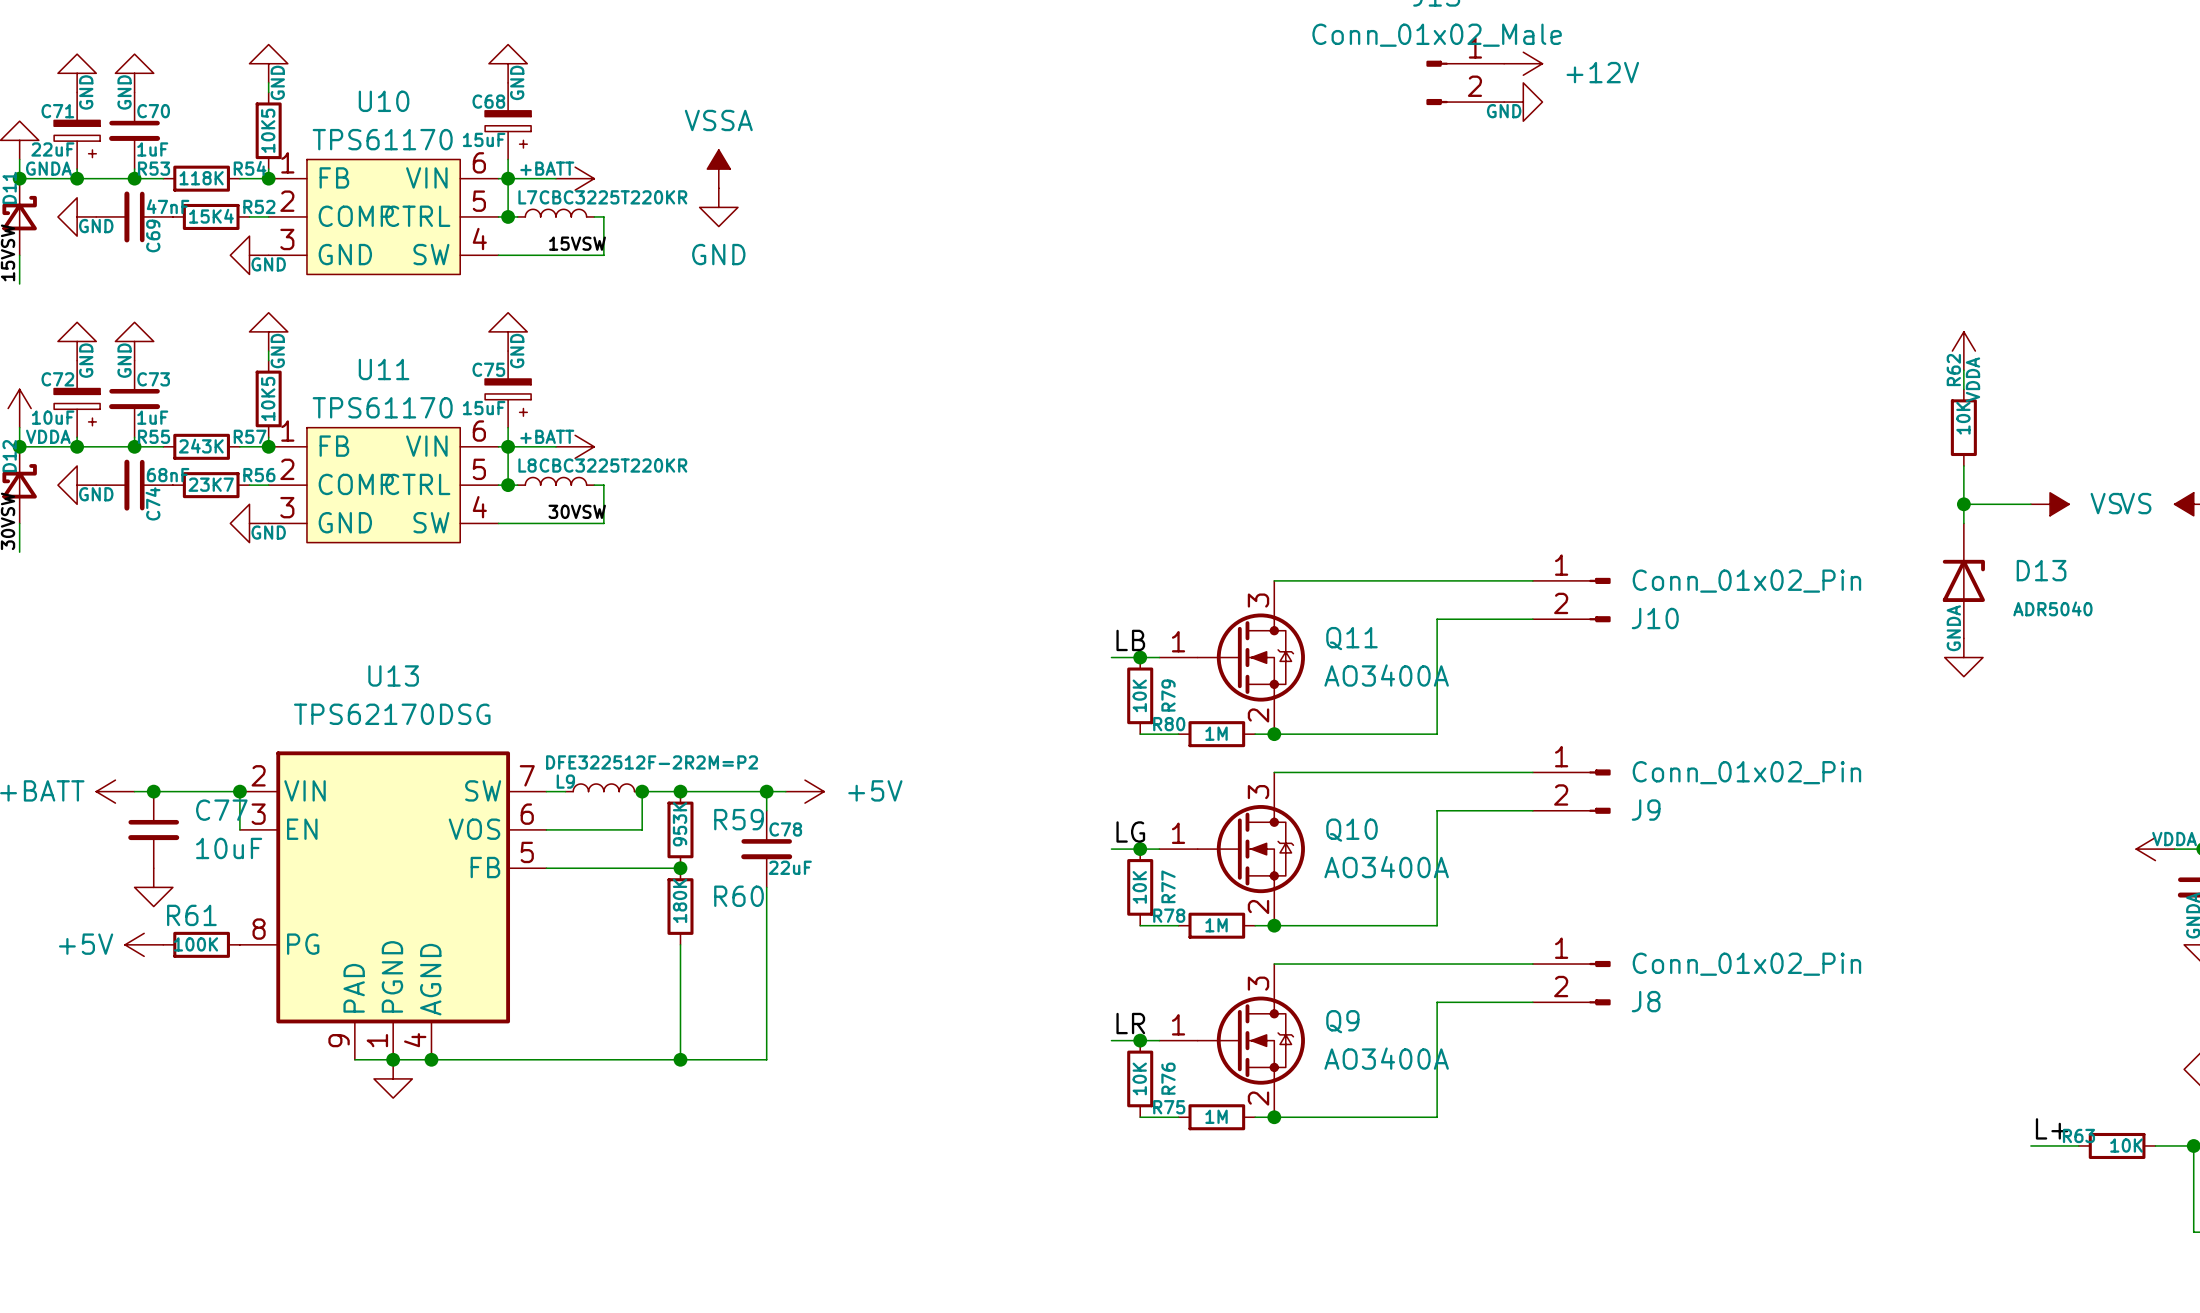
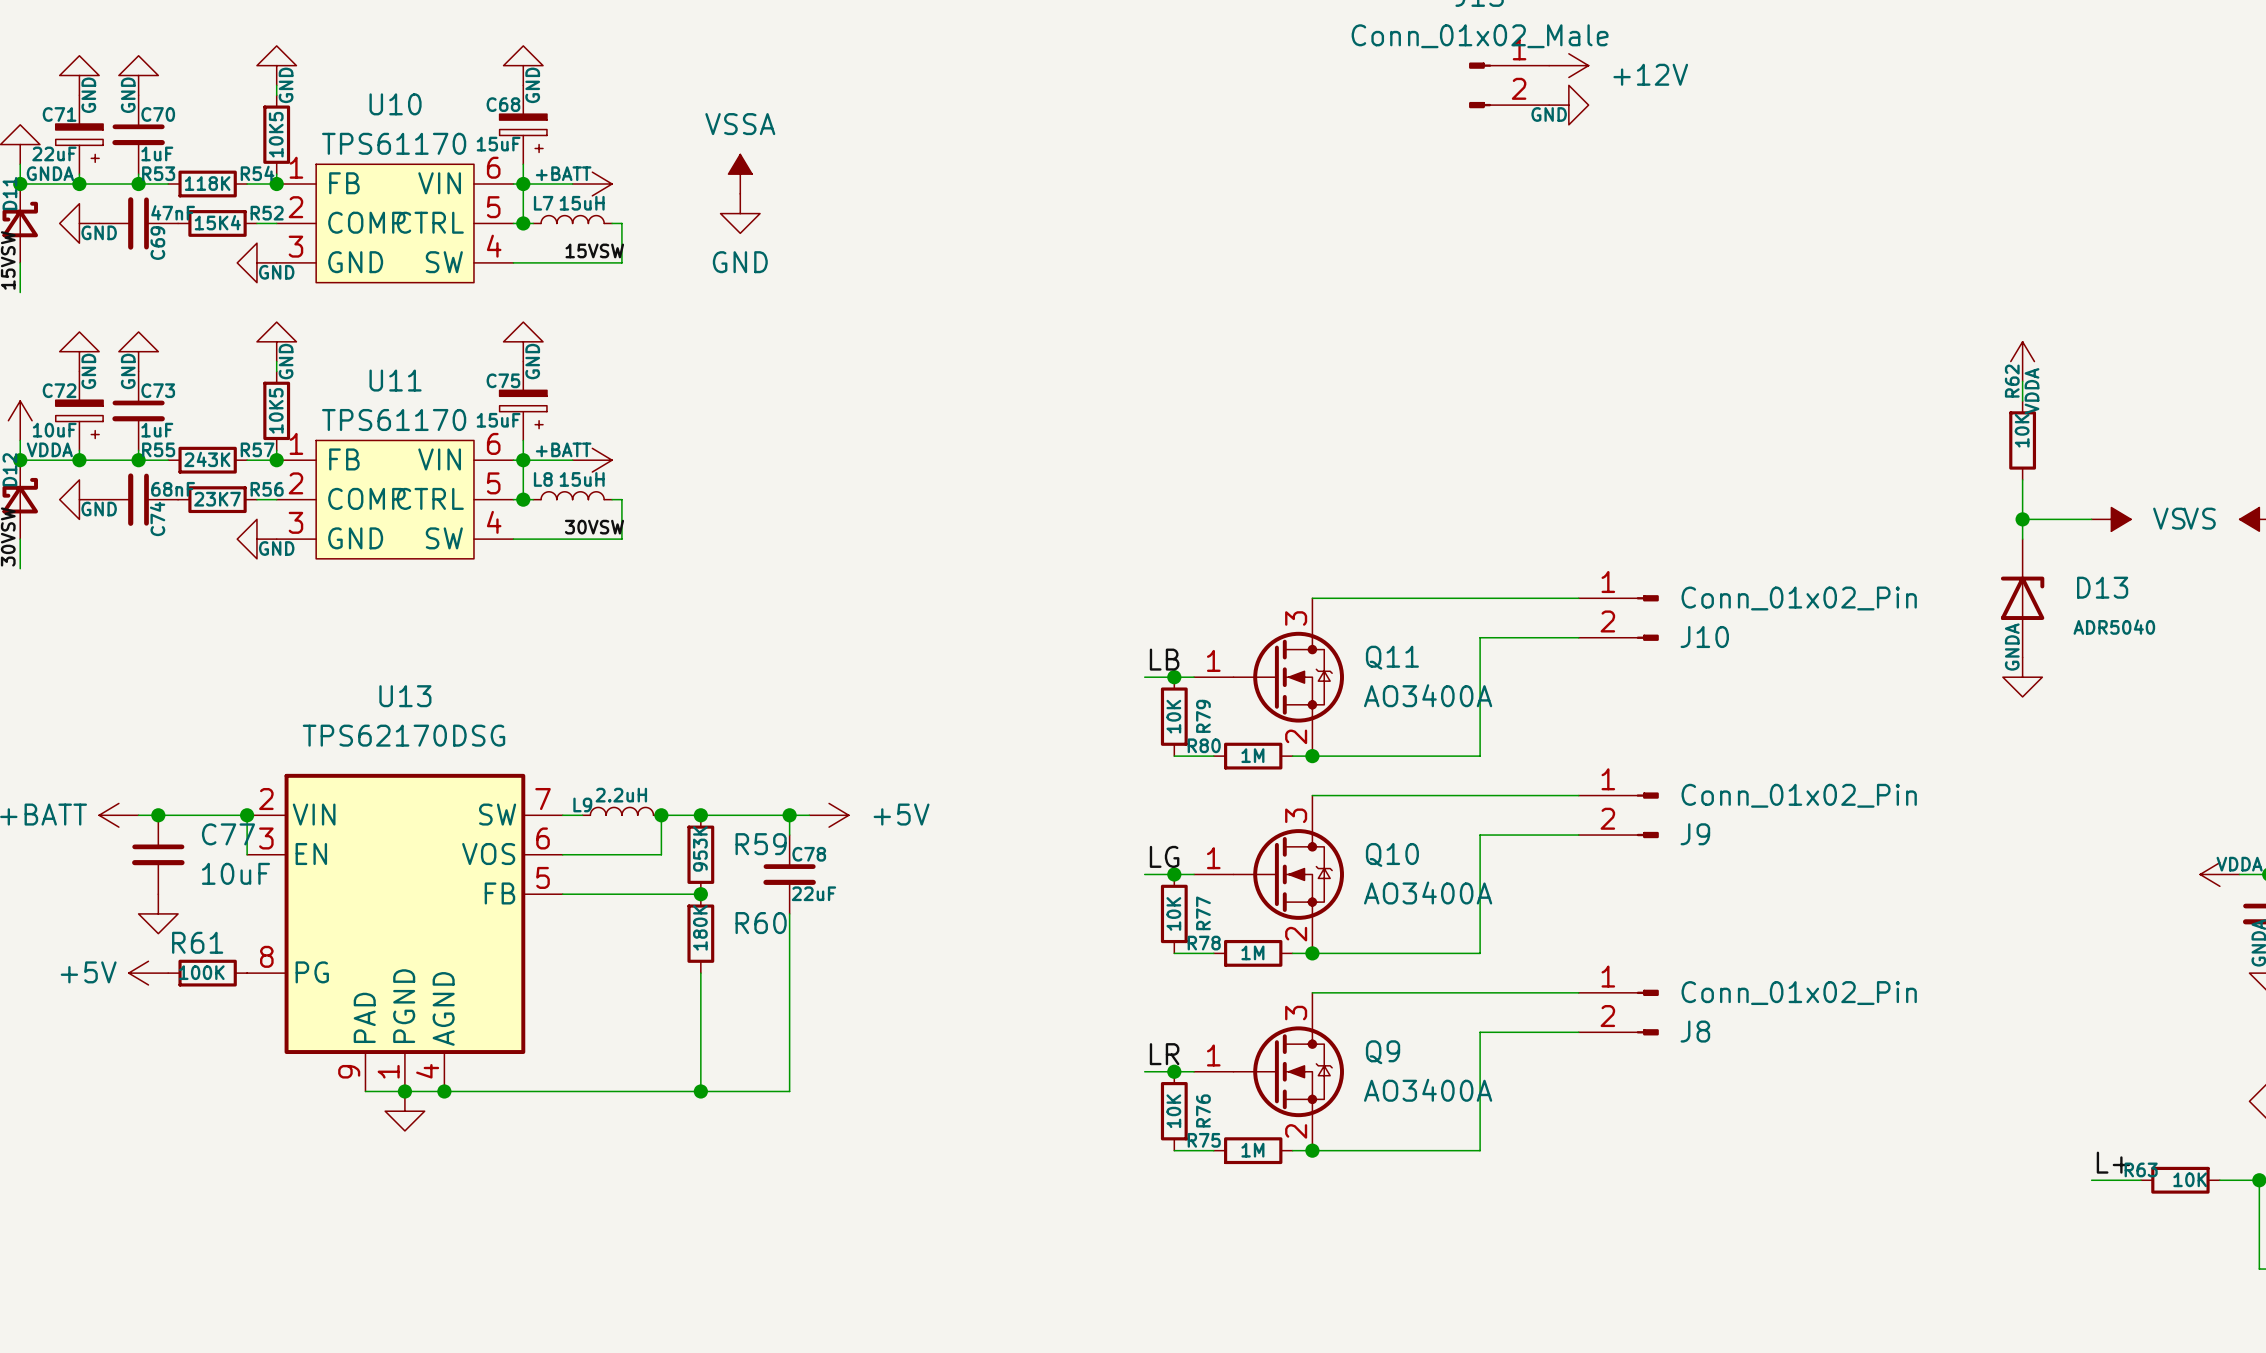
L7 value: CBC3225T220KR (613, 197) -> 15uH (582, 203)
L8 value: CBC3225T220KR (613, 465) -> 15uH (582, 479)
L9 value: DFE322512F-2R2M=P2 (652, 762) -> 2.2uH (621, 795)

